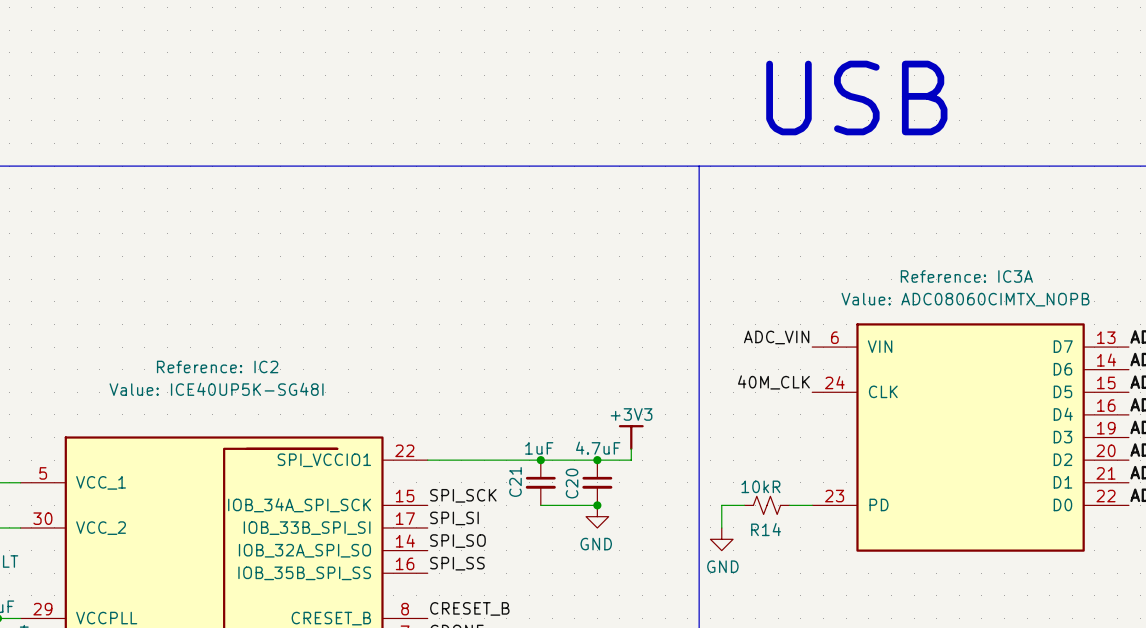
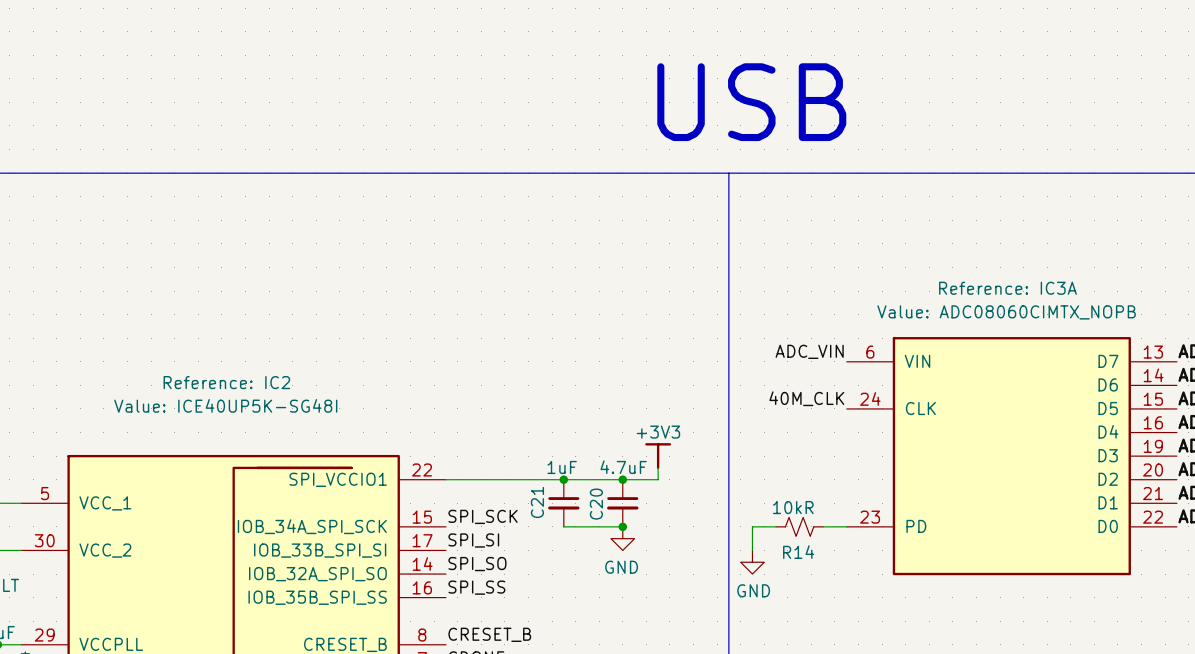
text position: USB (856, 97) -> USB (751, 102)

